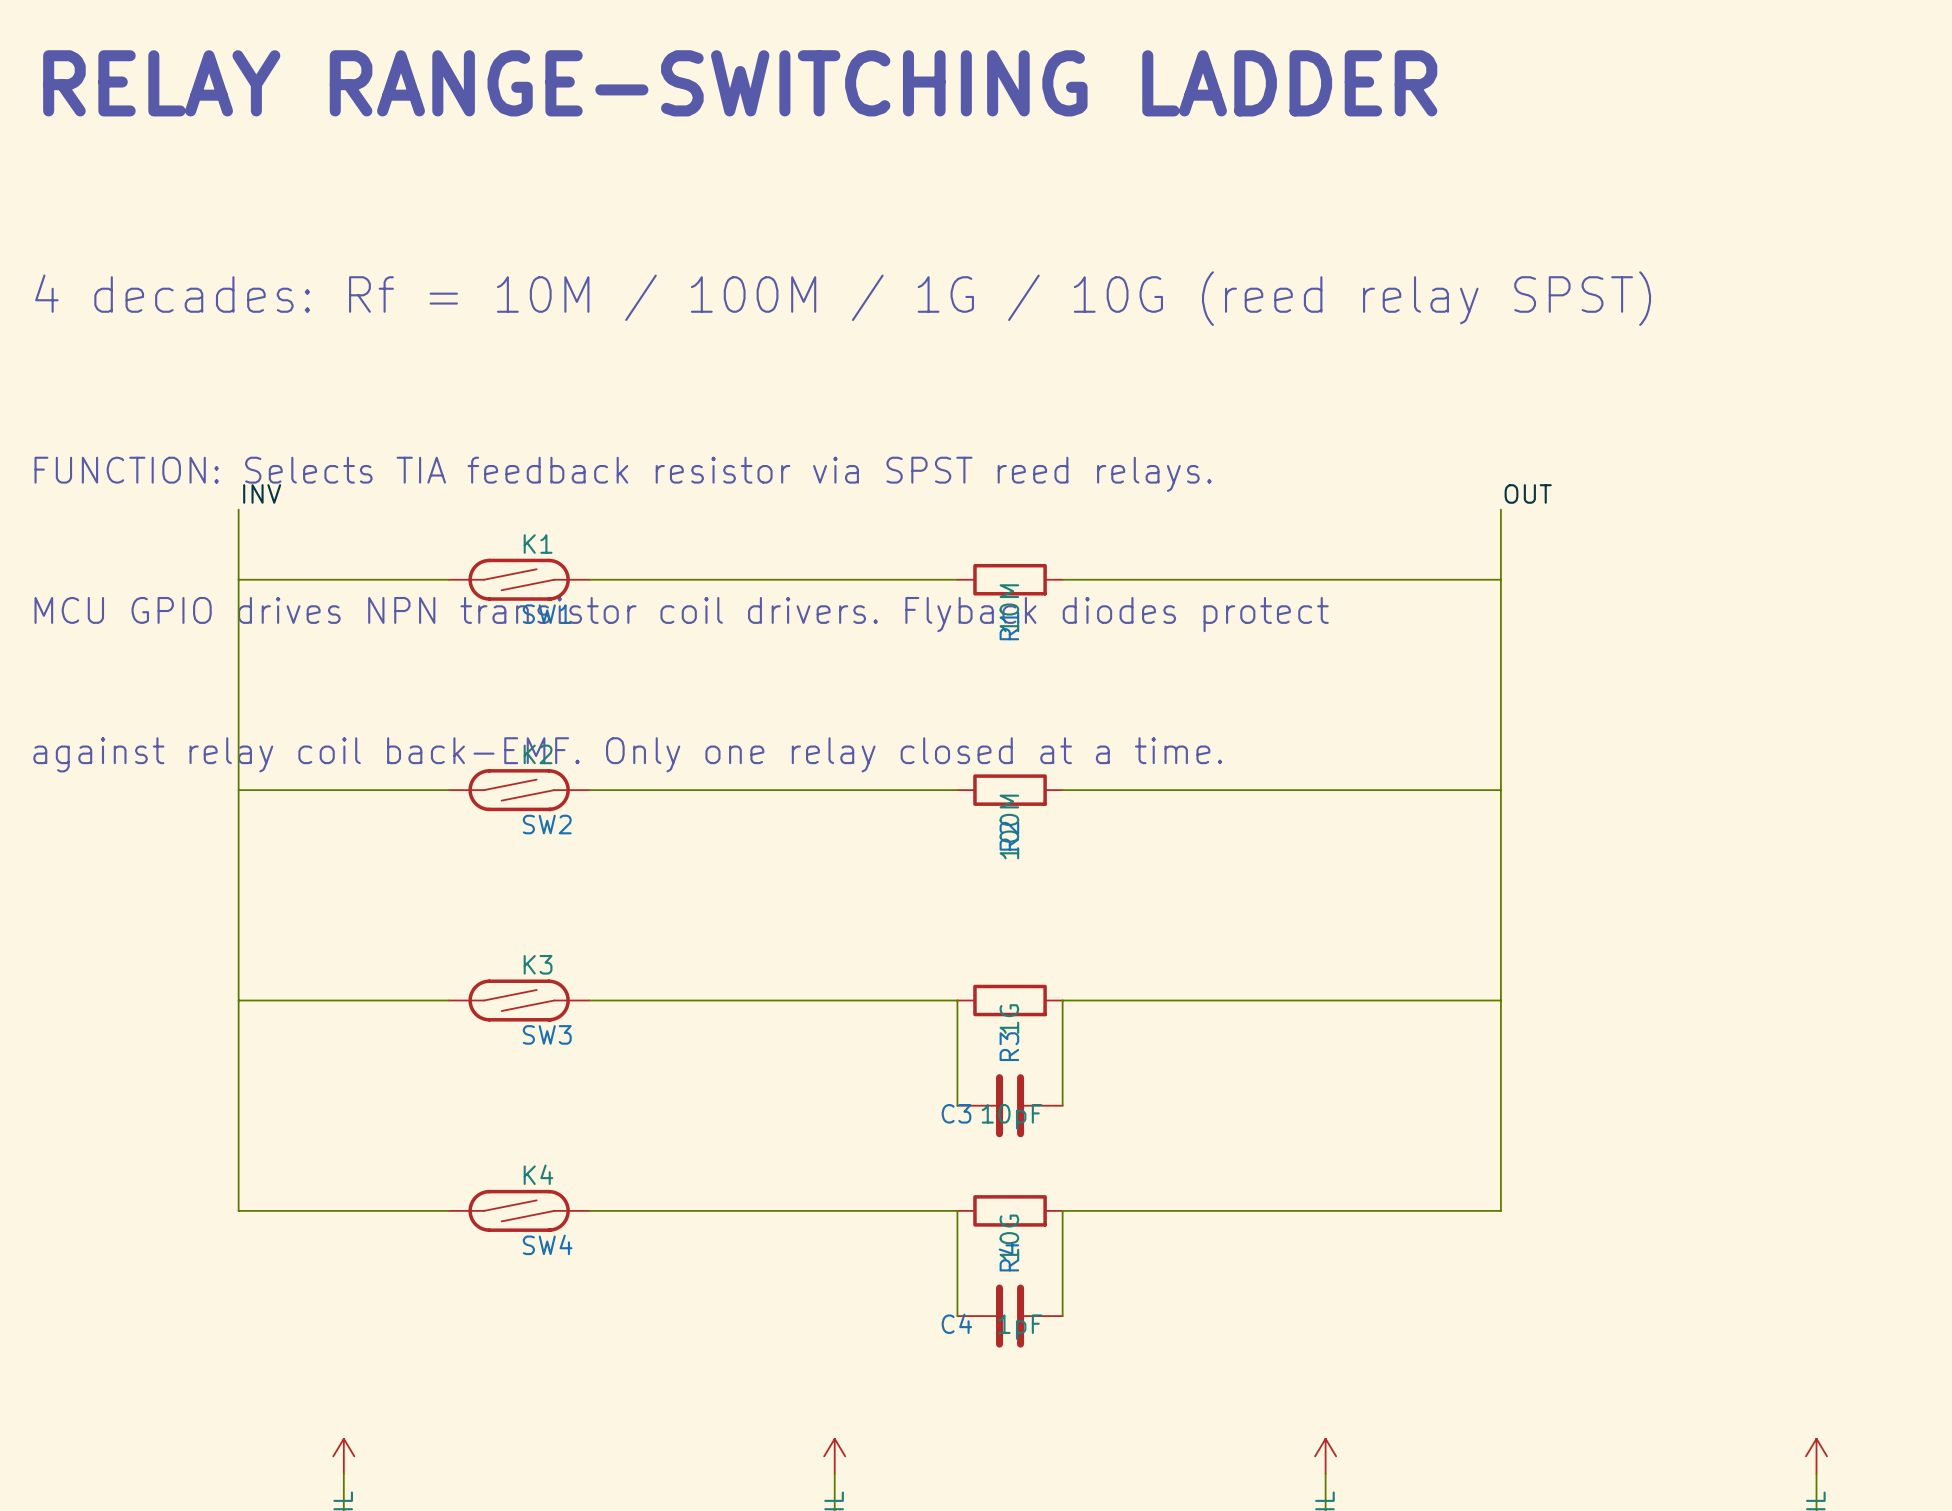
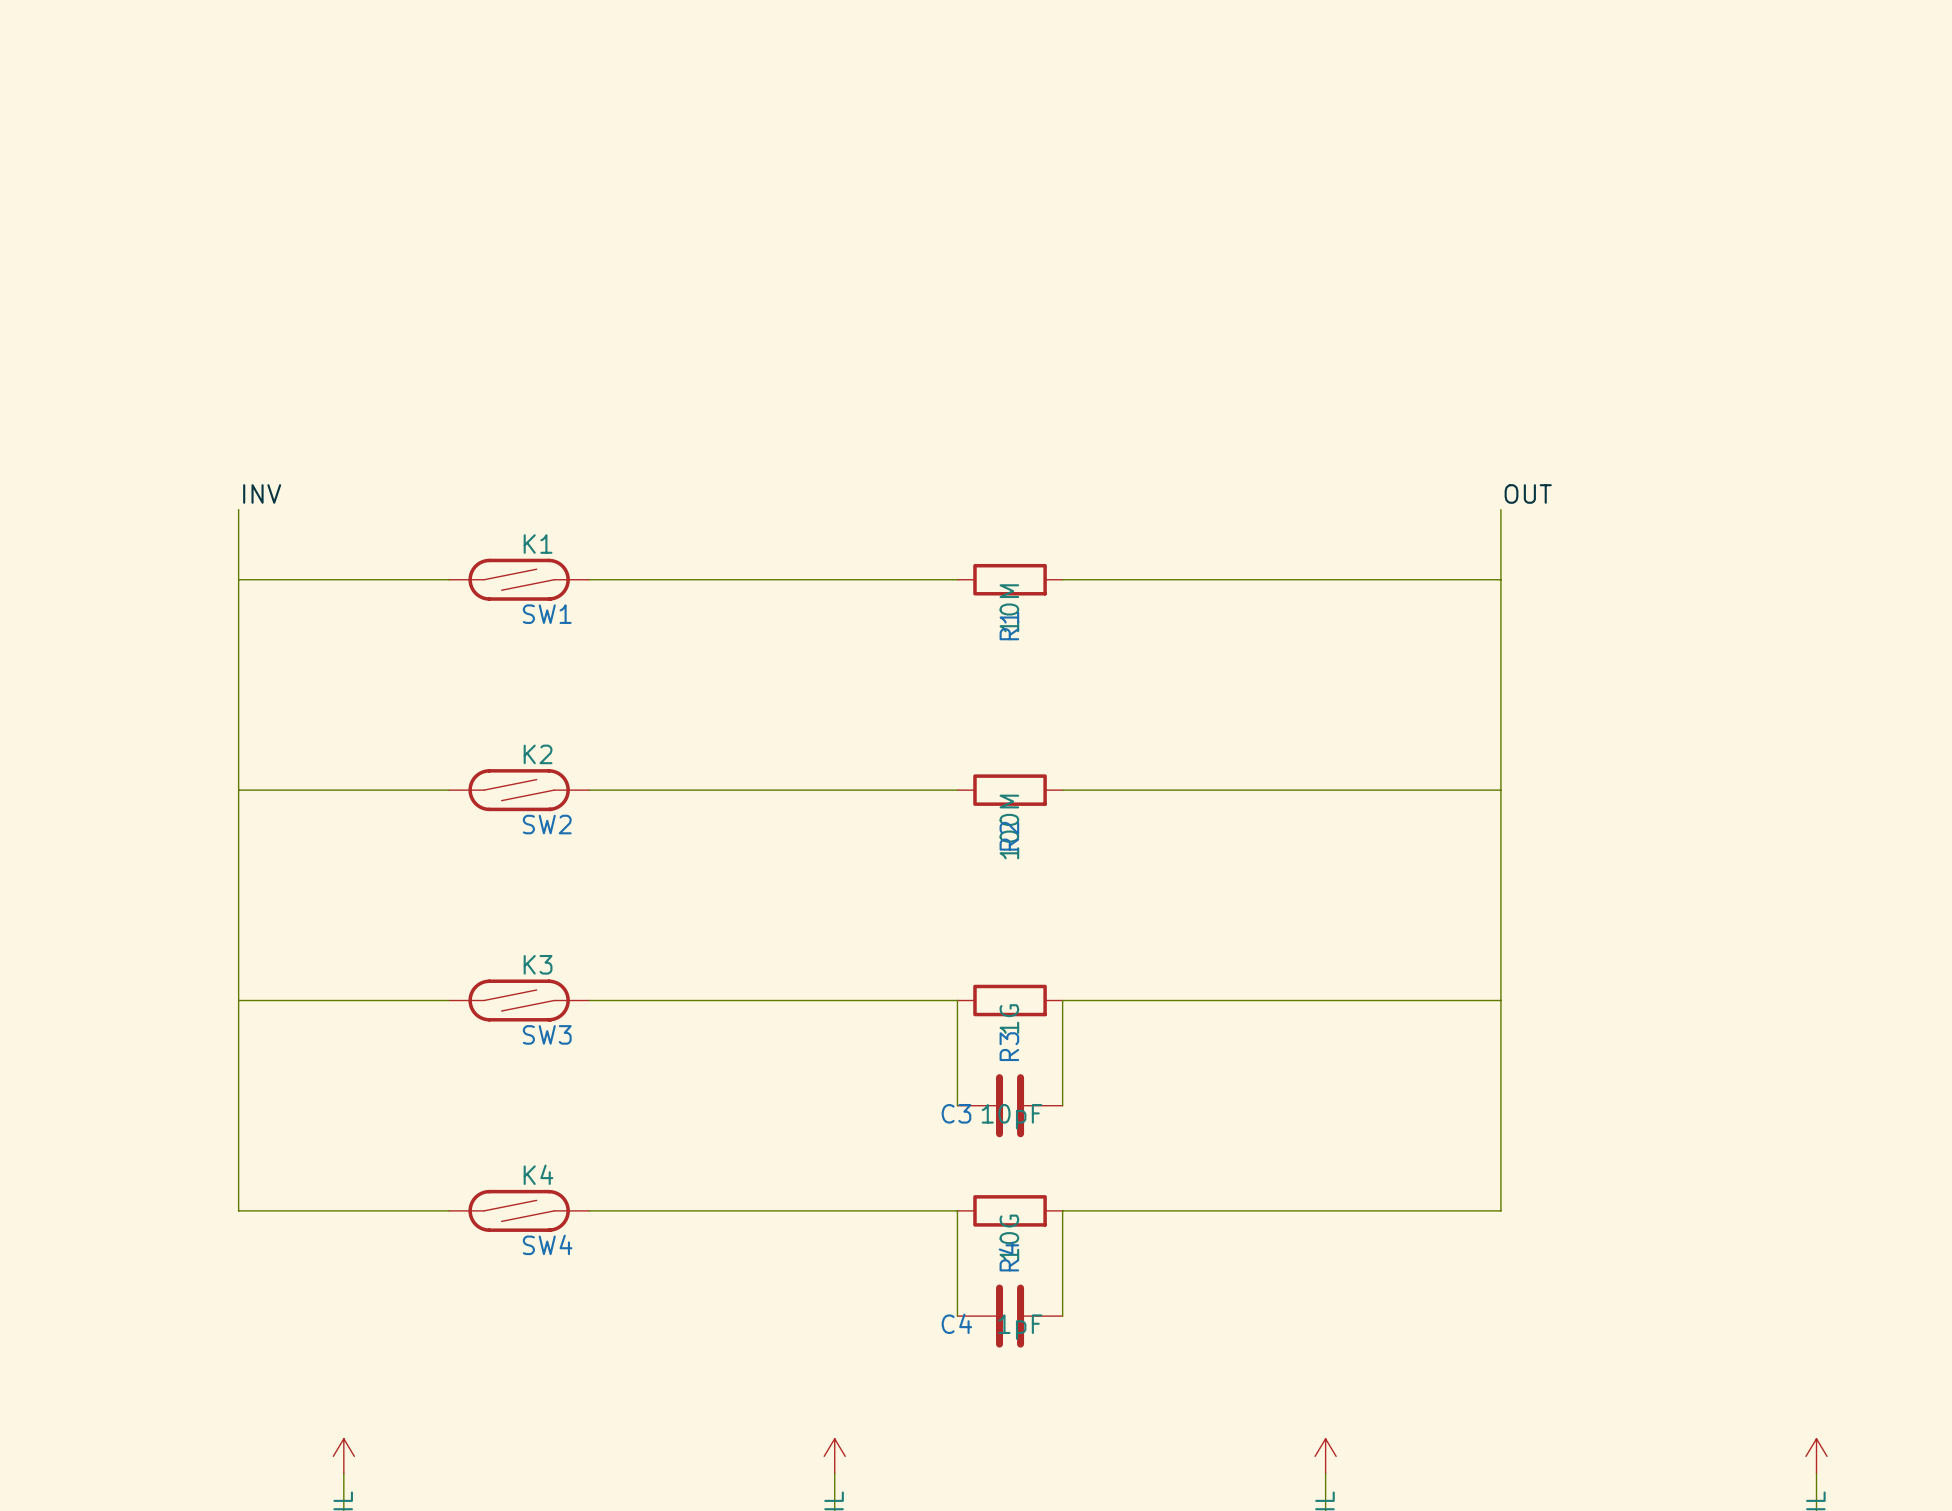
text: RELAY RANGE-SWITCHING LADDER (740, 83) -> none
text: 4 decades: Rf = 10M / 100M / 1G / 10G (reed relay SPST) (843, 298) -> none
text: FUNCTION: Selects TIA feedback resistor via SPST reed relays. (623, 474) -> none
text: MCU GPIO drives NPN transistor coil drivers. Flyback diodes protect (681, 614) -> none
text: against relay coil back-EMF. Only one relay closed at a time. (627, 754) -> none

